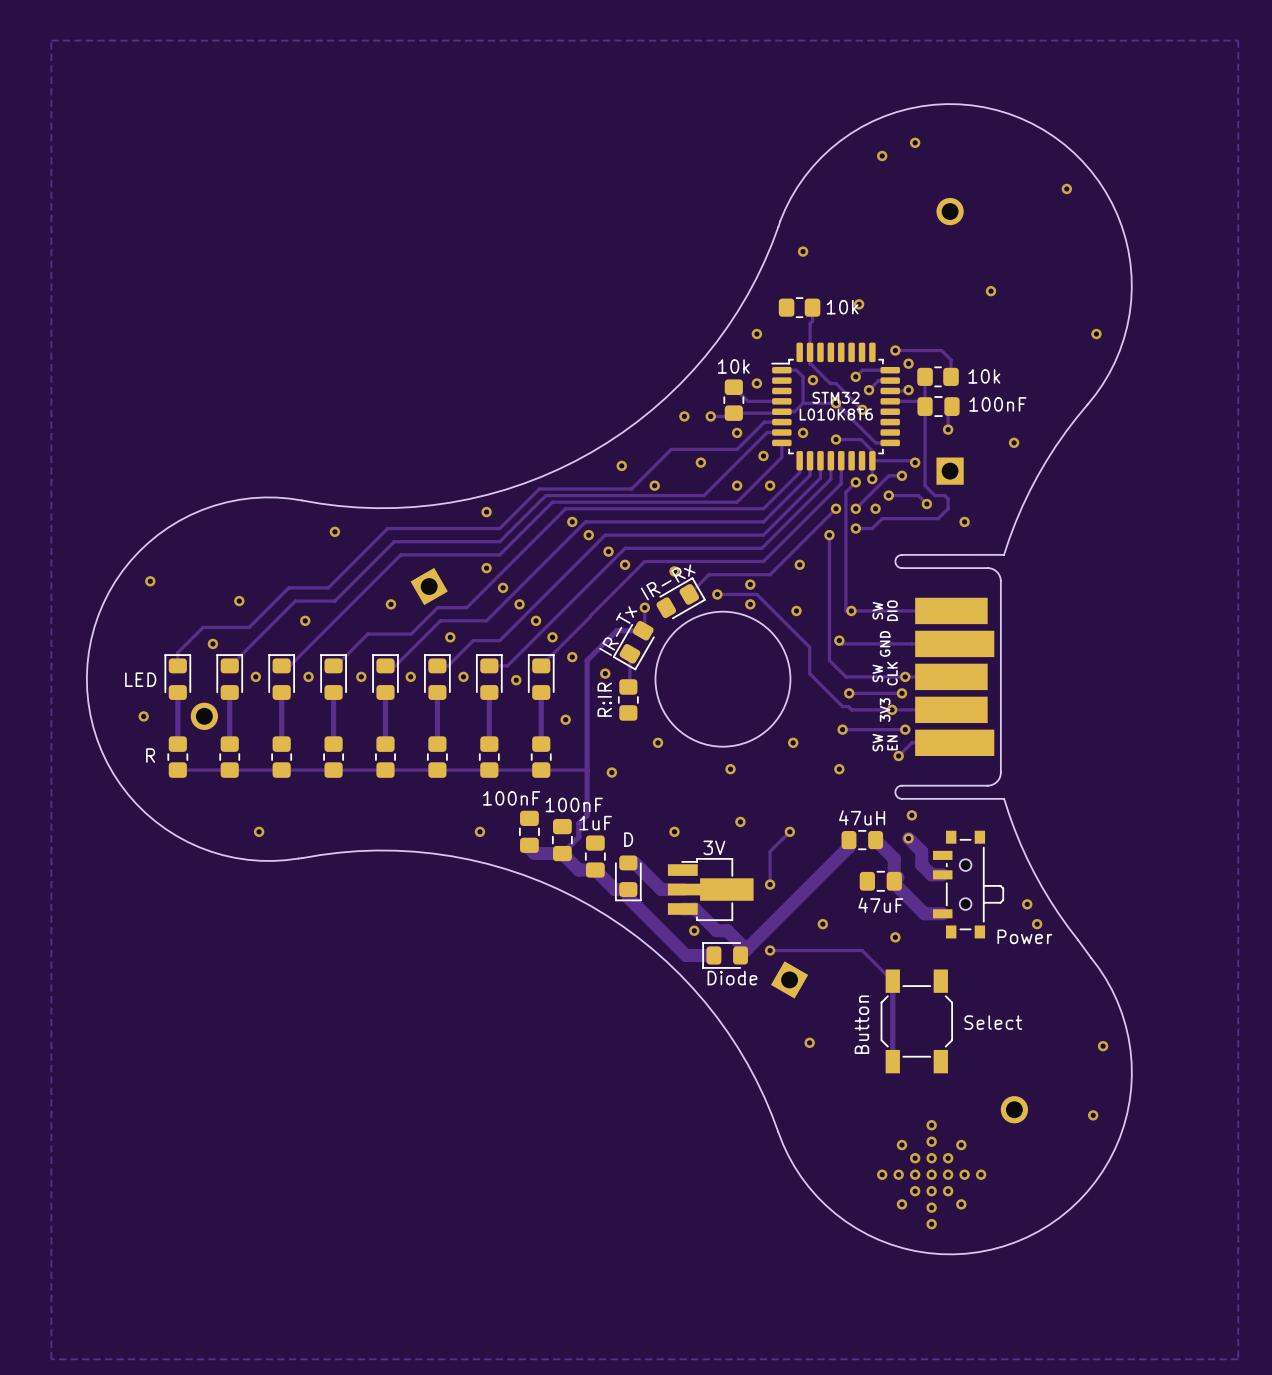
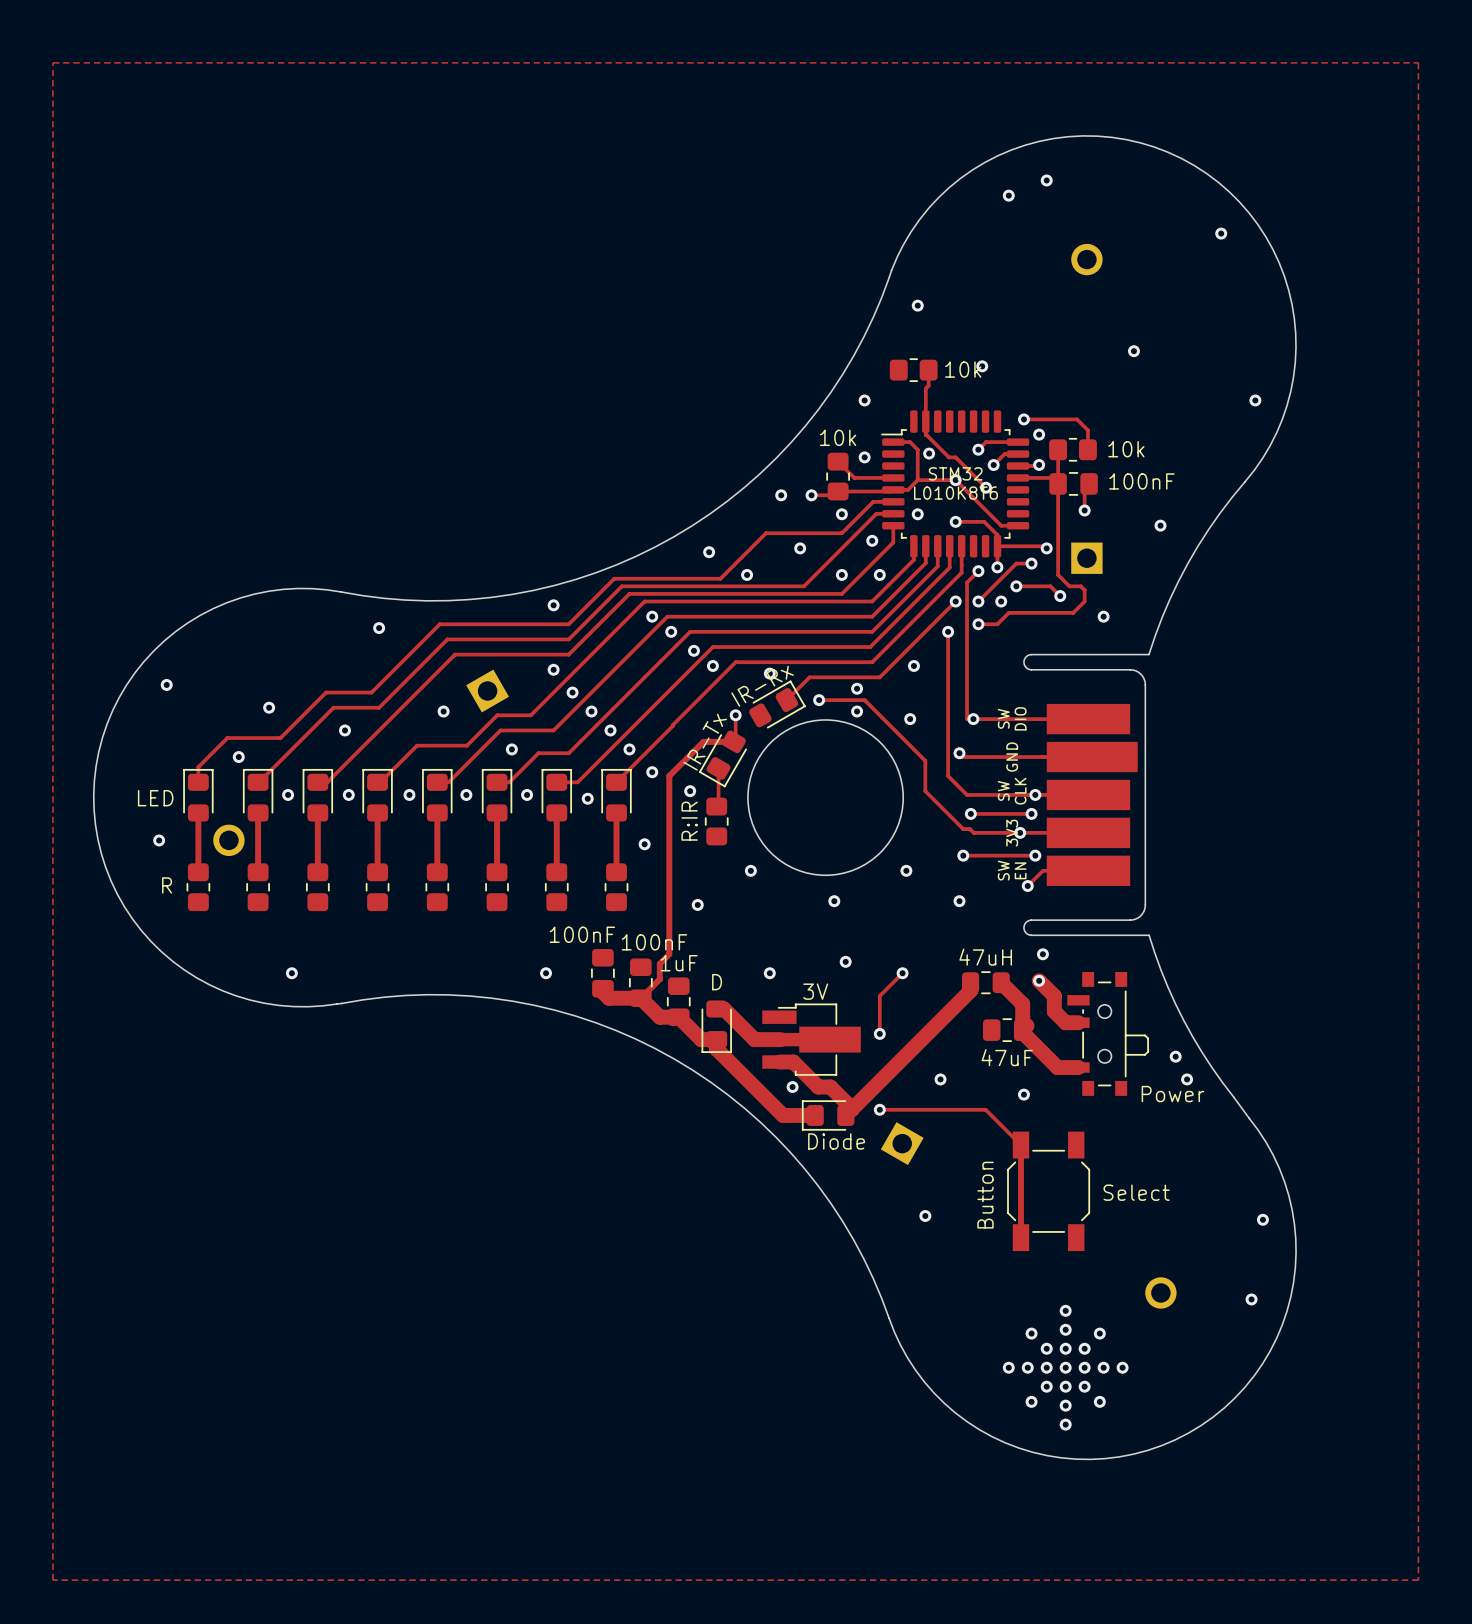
part footprint: [915, 597, 995, 757] -> [1046, 703, 1138, 886]
track: (177, 770) (587, 770) -> none

